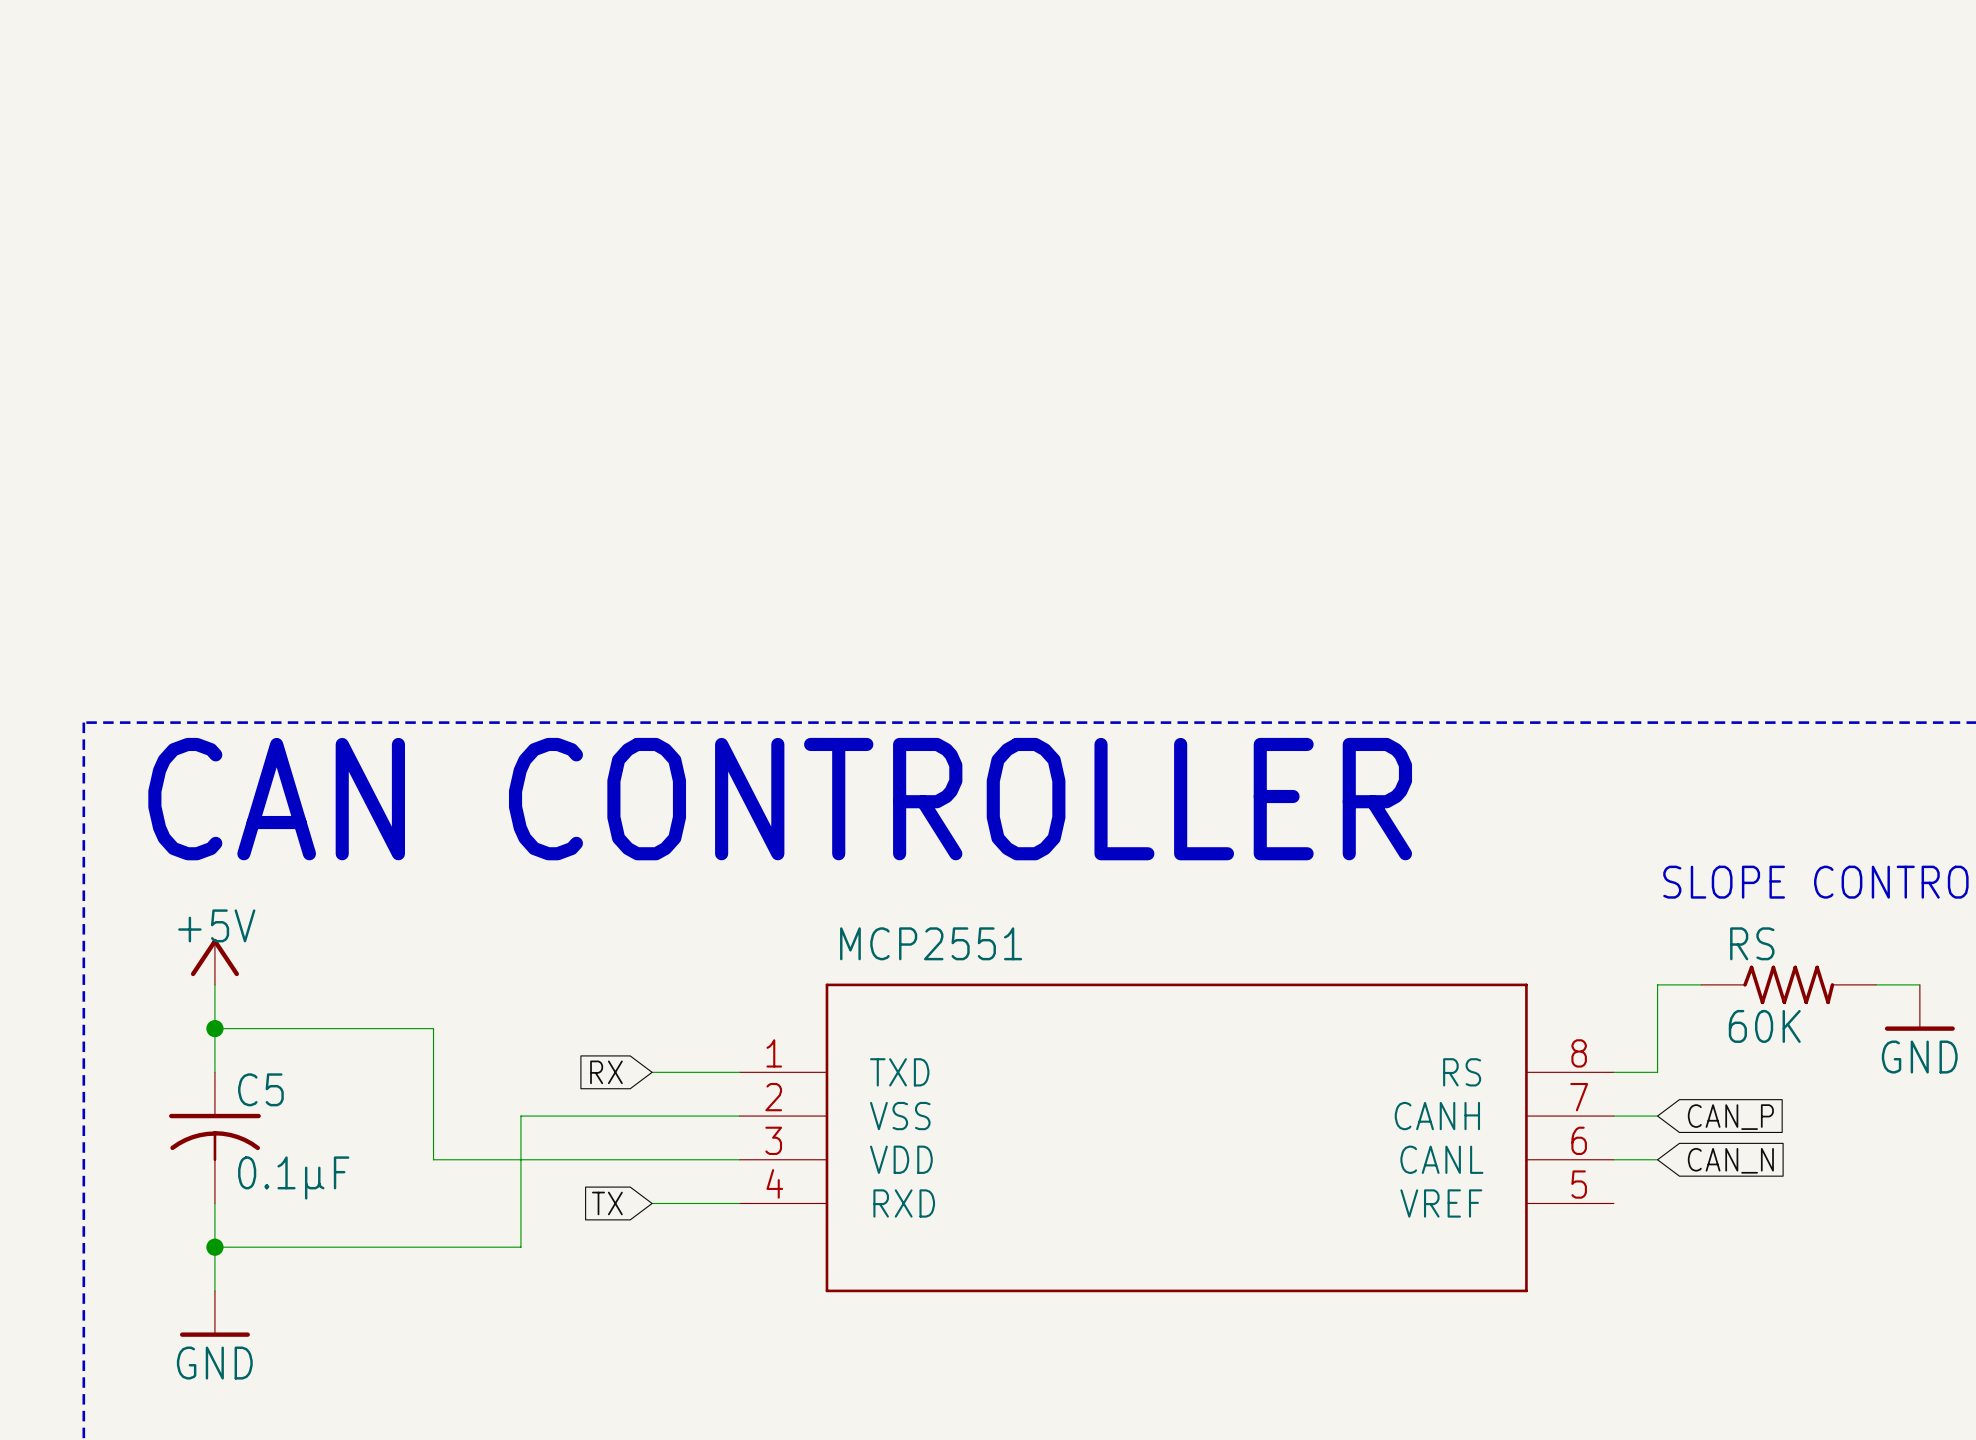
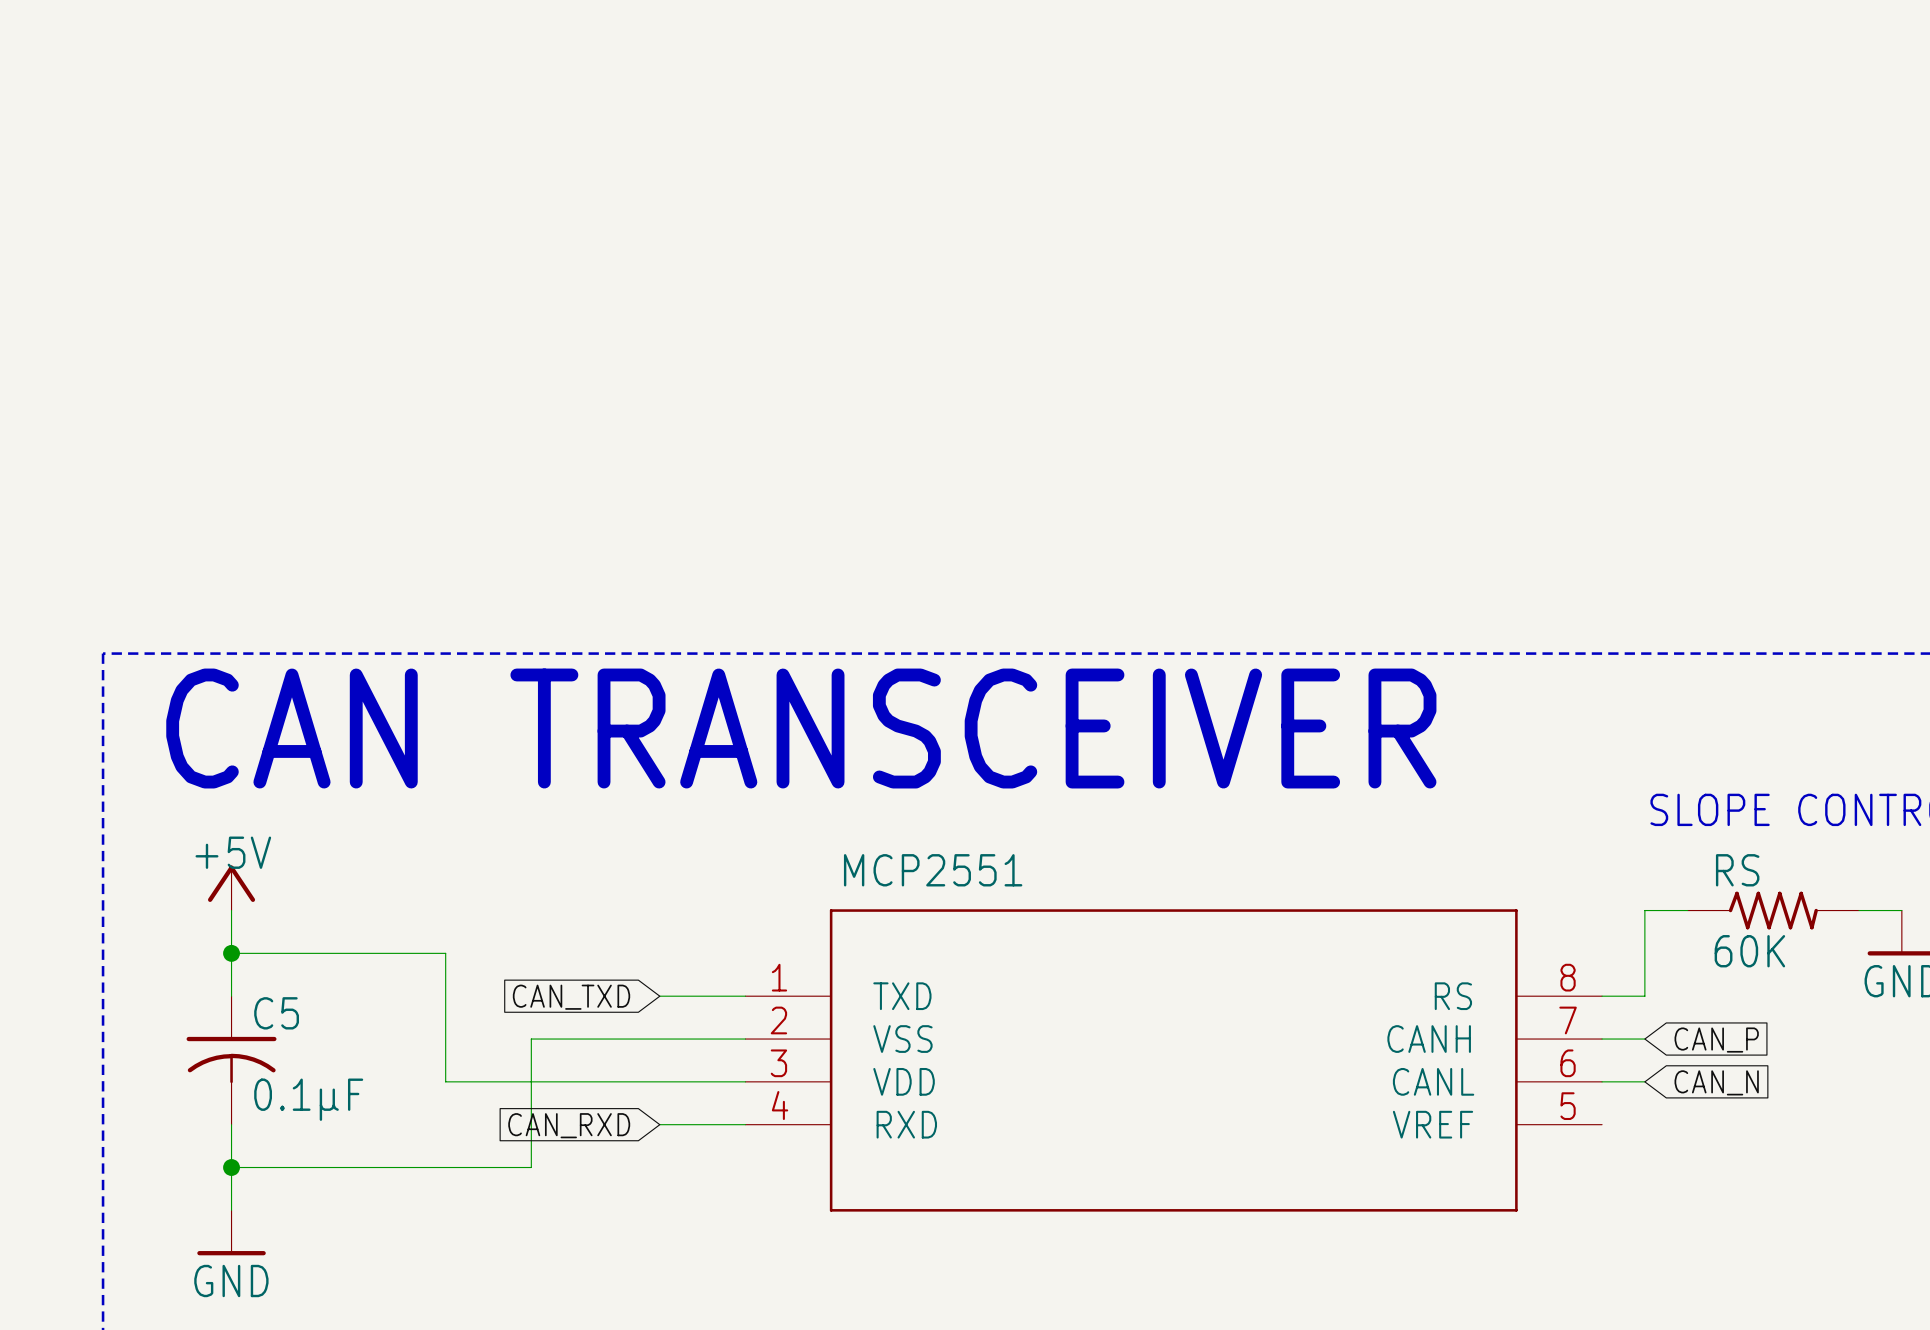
text: CAN CONTROLLER (780, 799) -> CAN TRANSCEIVER (801, 728)
global label: RX (606, 1072) -> CAN_TXD (571, 997)
global label: TX (607, 1203) -> CAN_RXD (569, 1125)

